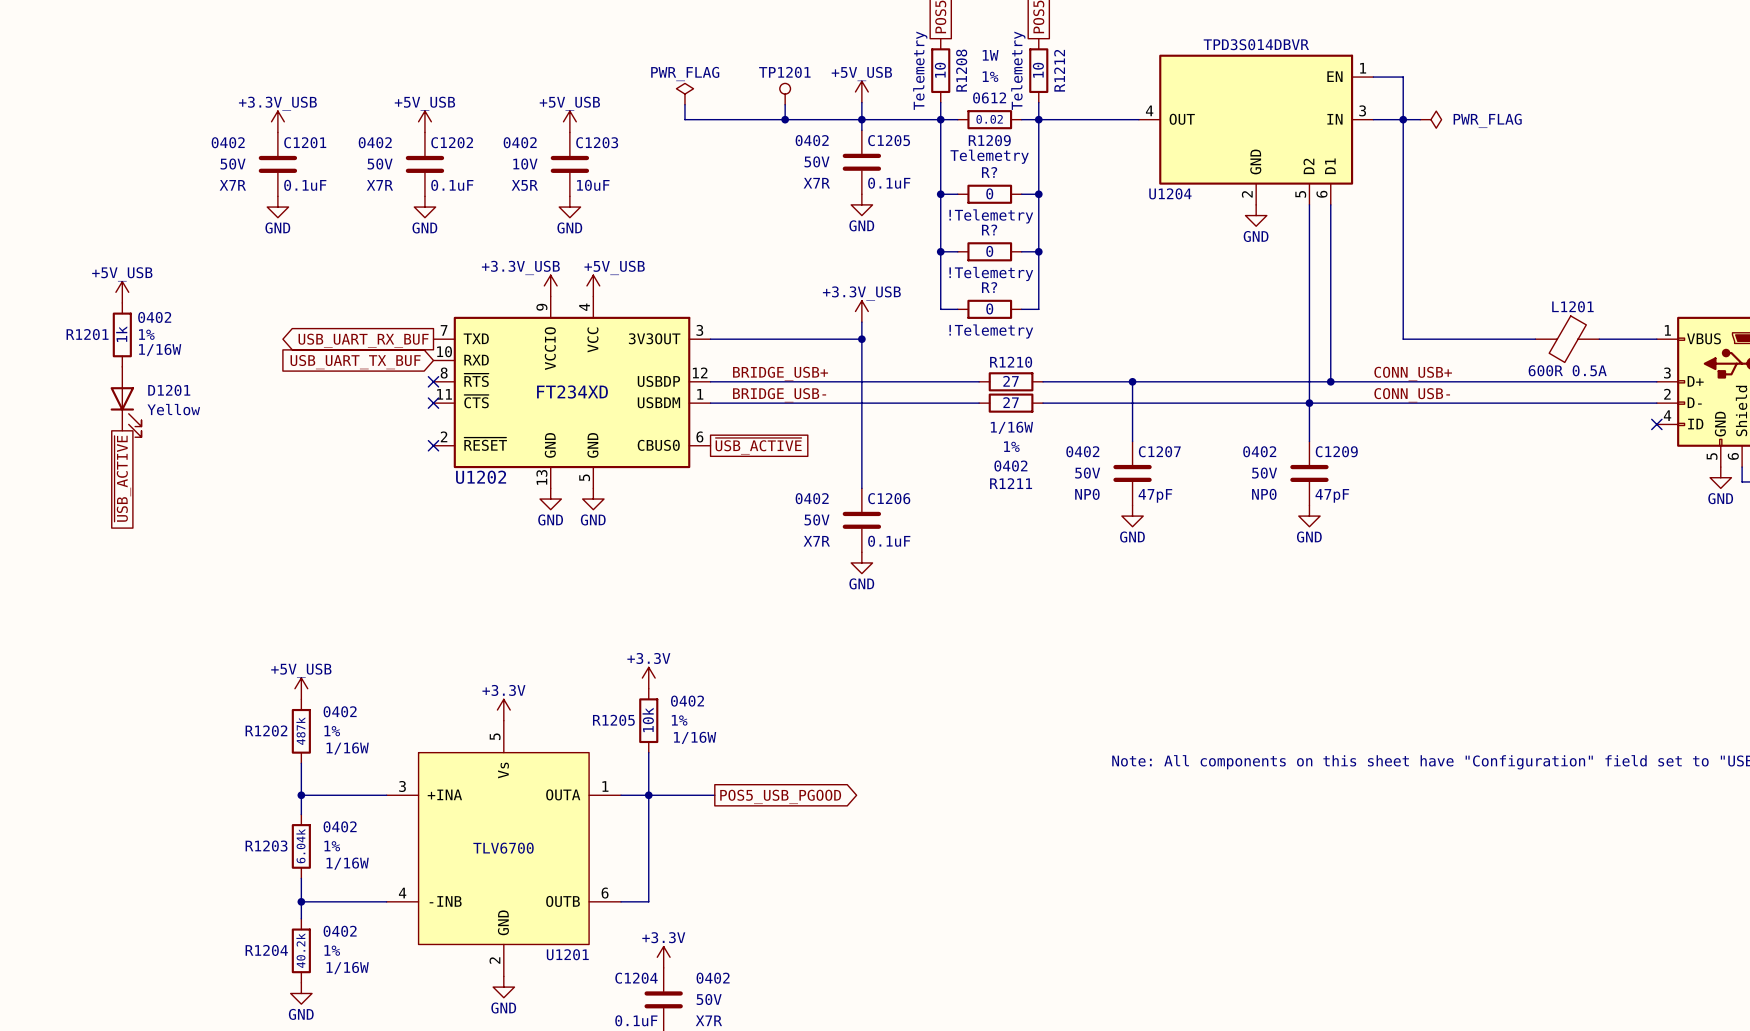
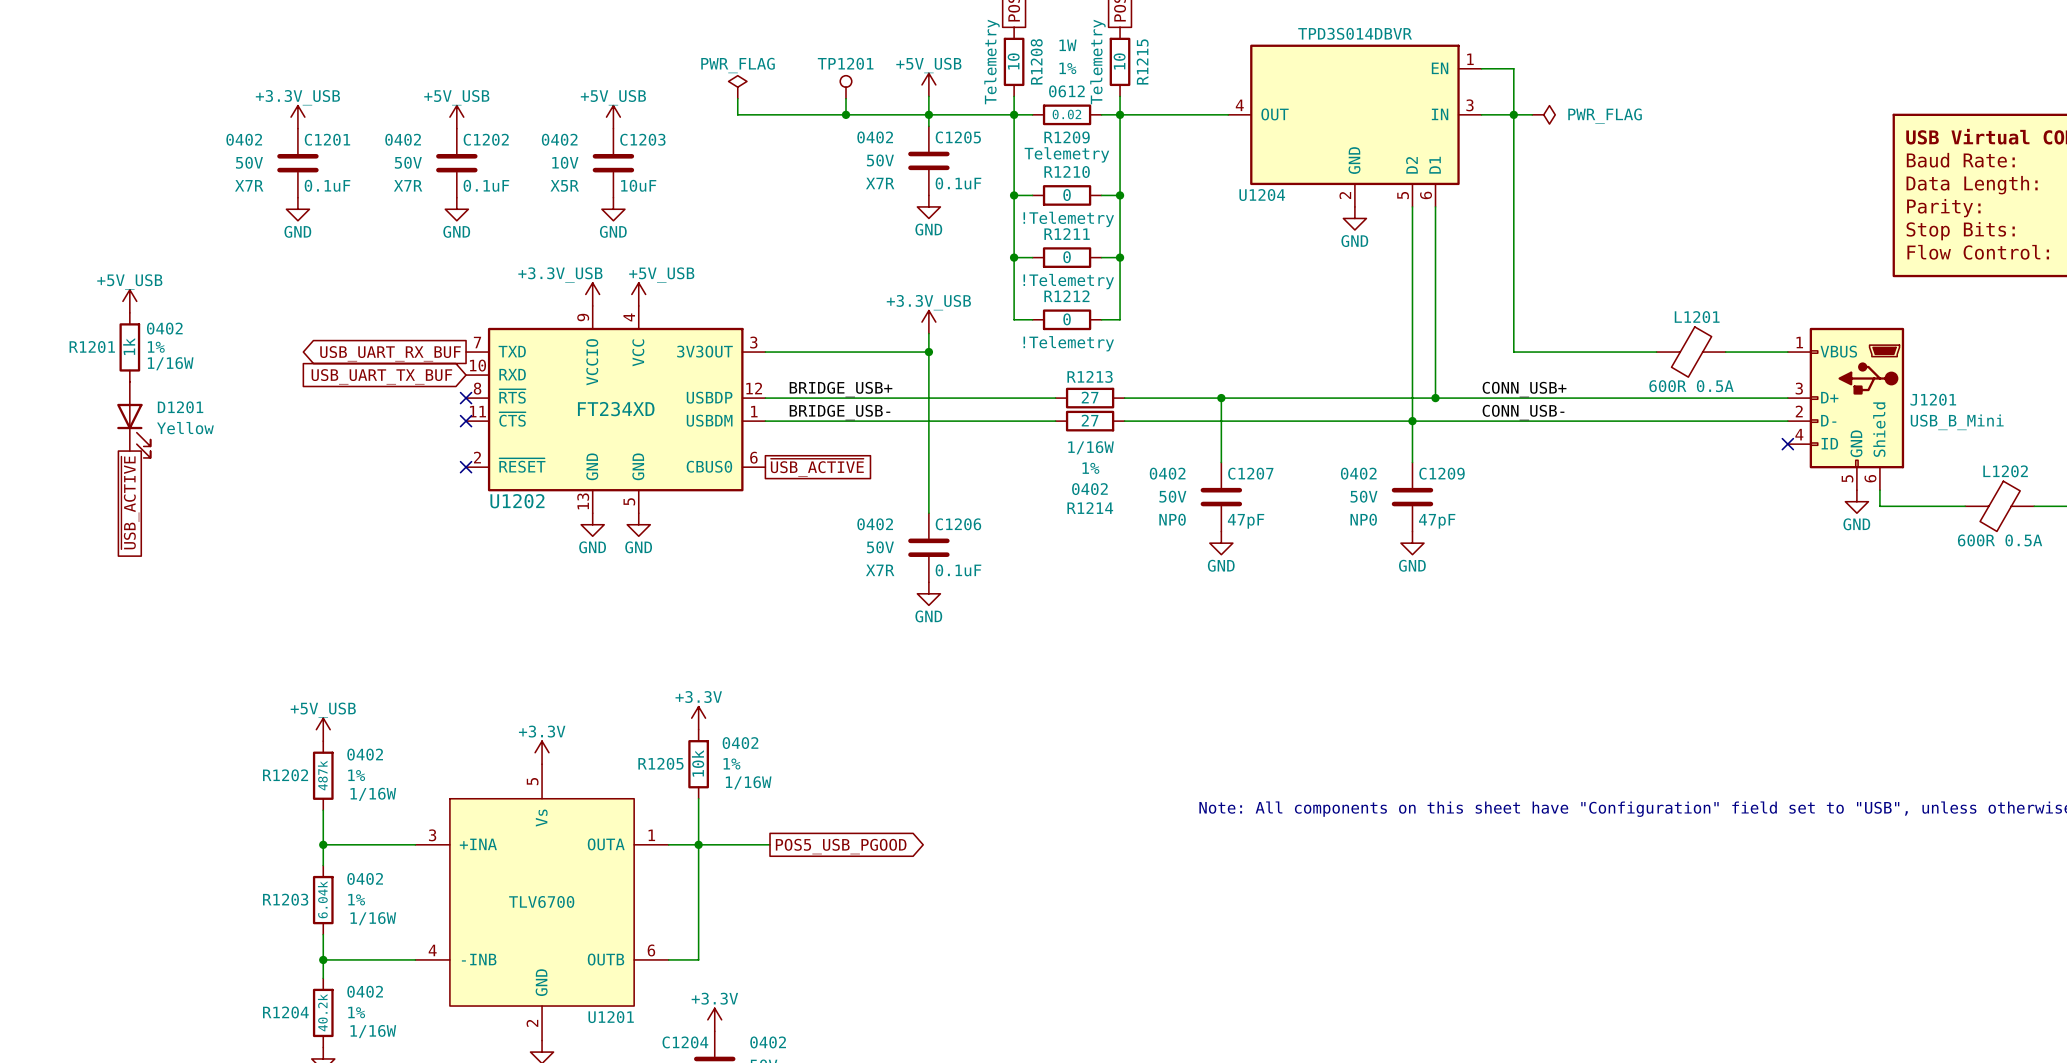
R1212 name: R1212 (1059, 70) -> R1215 (1142, 61)
R? name: R? (989, 172) -> R1210 (1067, 171)
R? name: R? (989, 229) -> R1211 (1067, 234)
R? name: R? (989, 287) -> R1212 (1066, 296)
R1210 name: R1210 (1011, 362) -> R1213 (1090, 376)
R1211 name: R1211 (1011, 483) -> R1214 (1090, 508)

